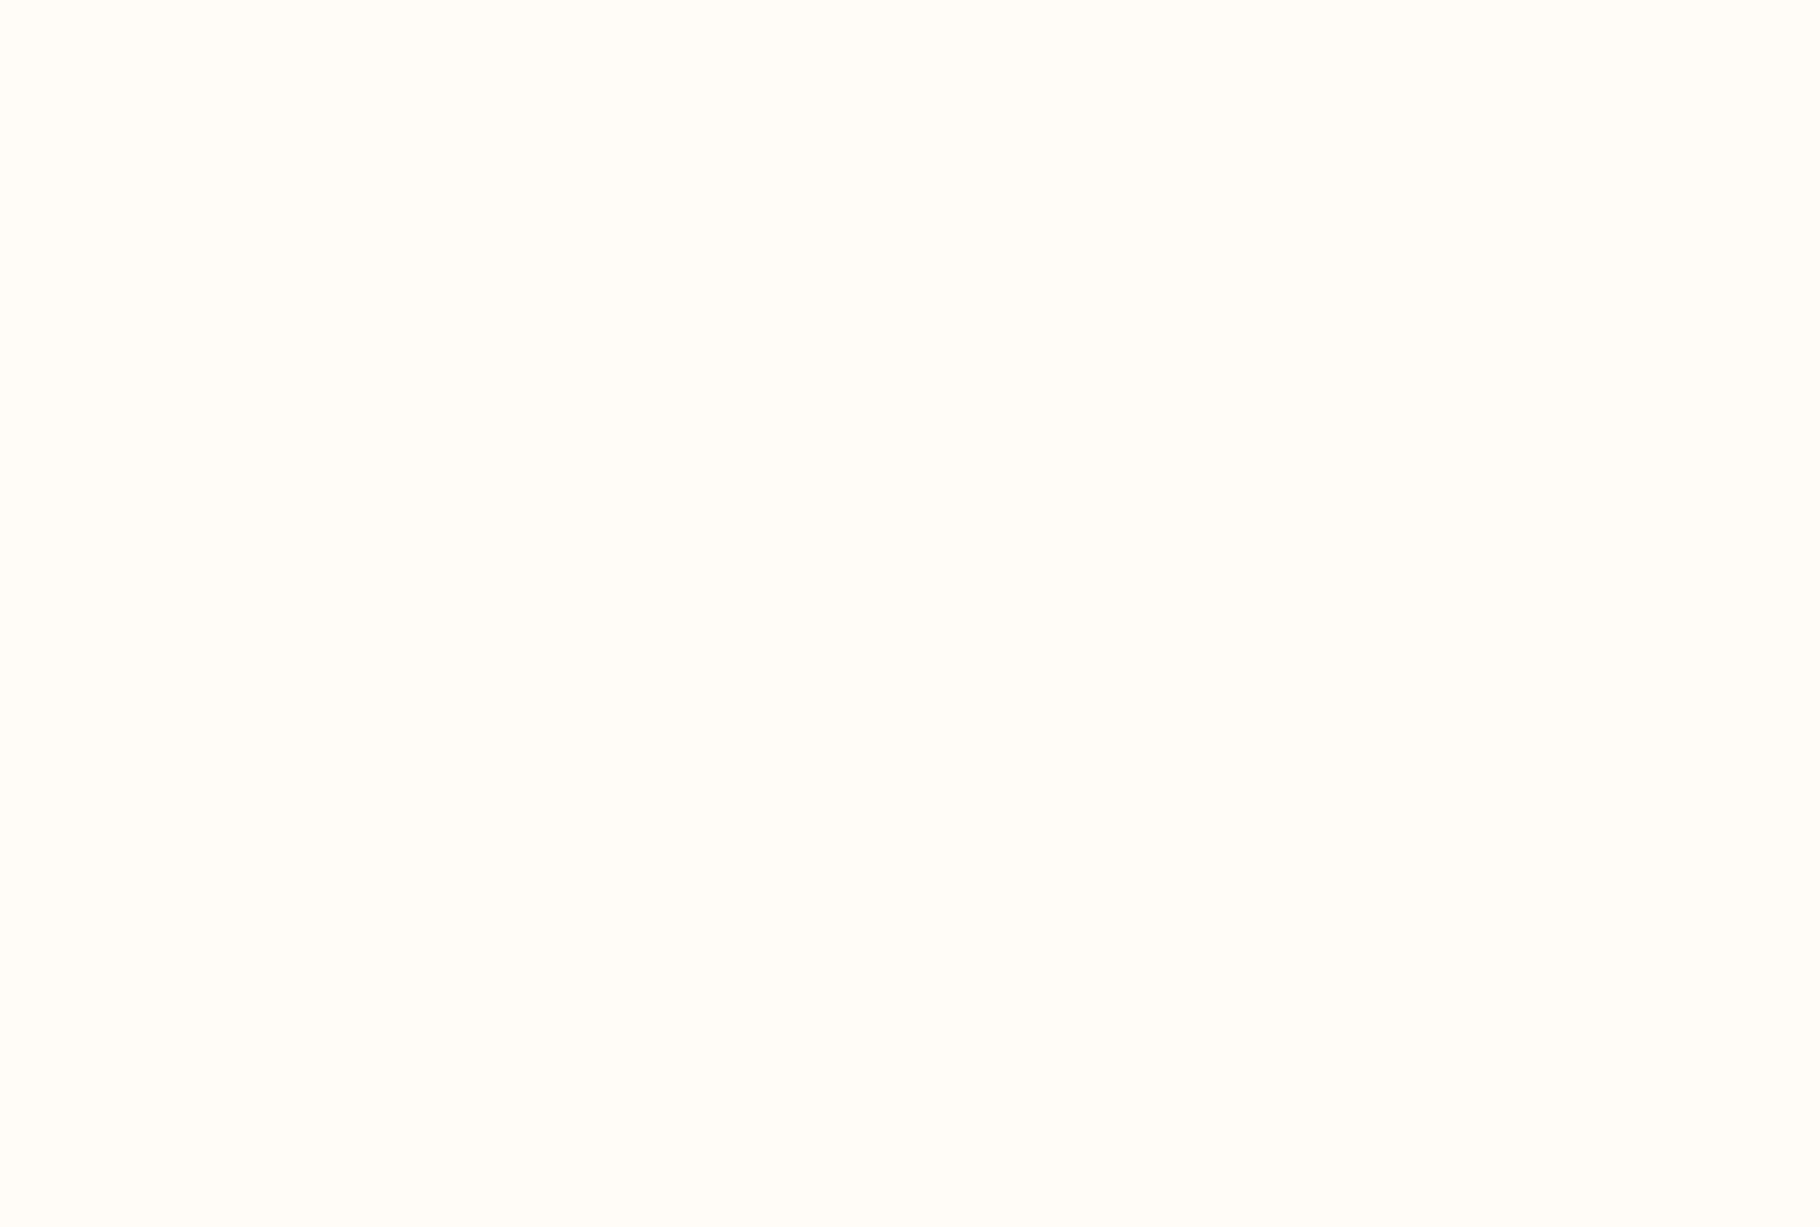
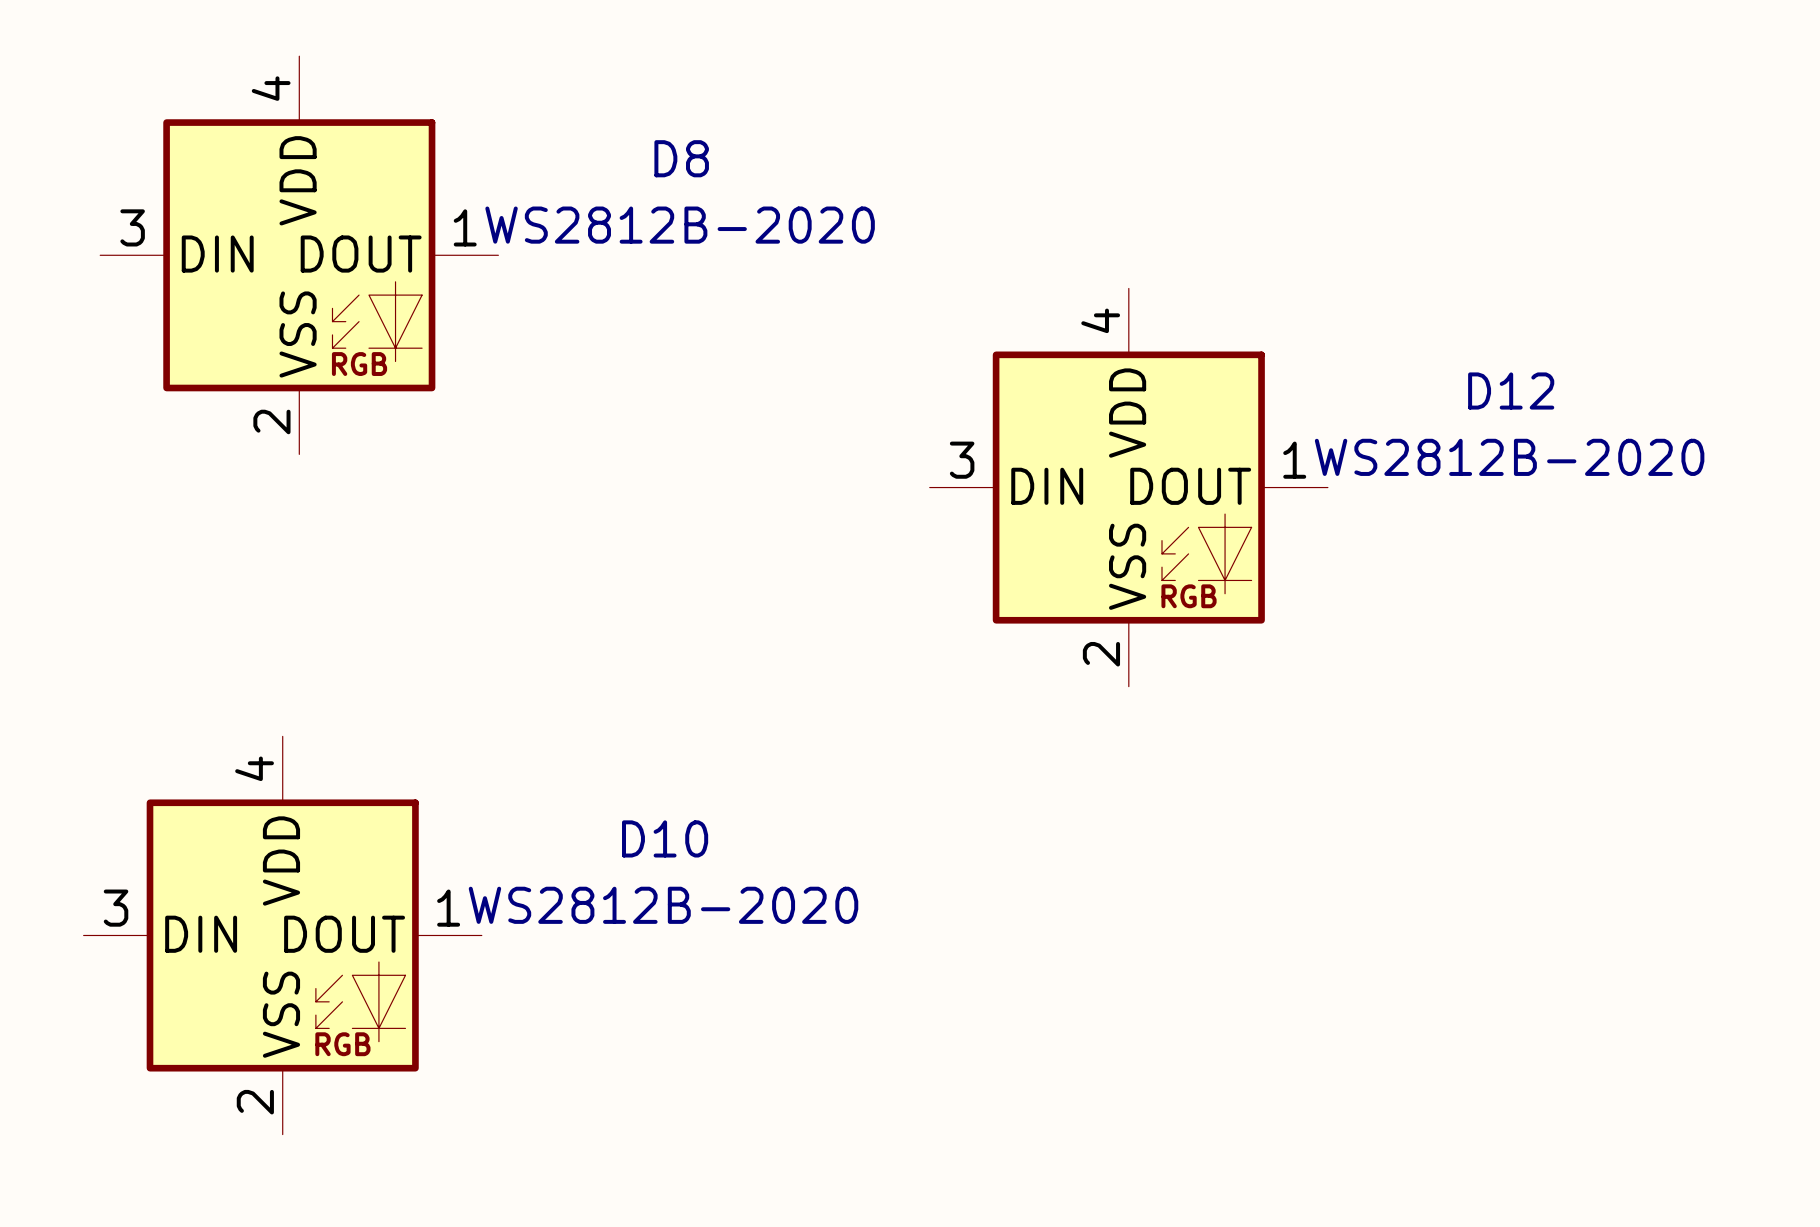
D8: none -> WS2812B-2020 (299, 255)
D12: none -> WS2812B-2020 (1128, 487)
D10: none -> WS2812B-2020 (282, 935)

